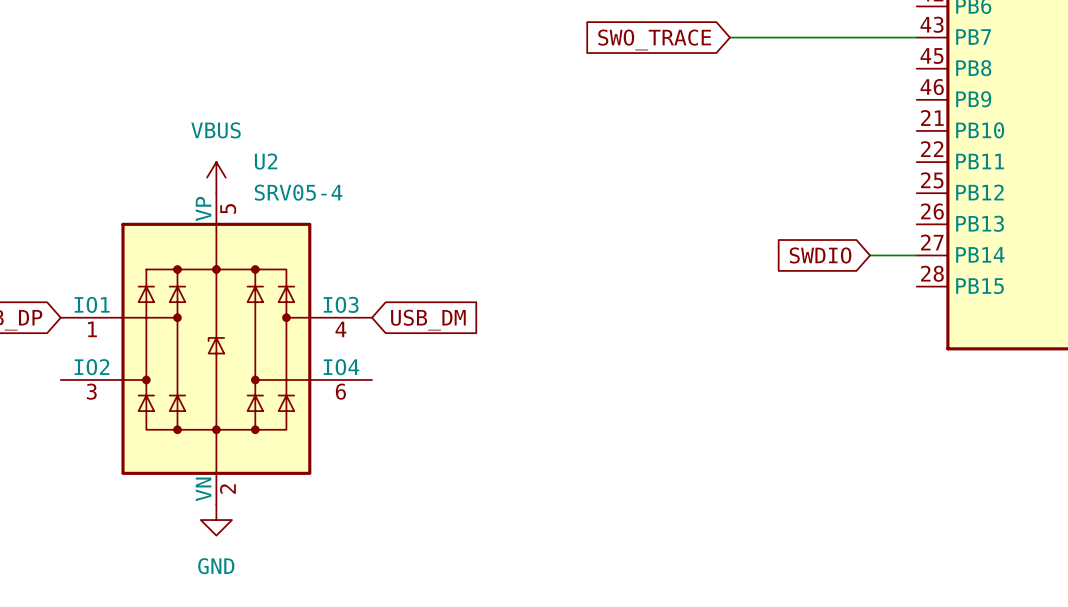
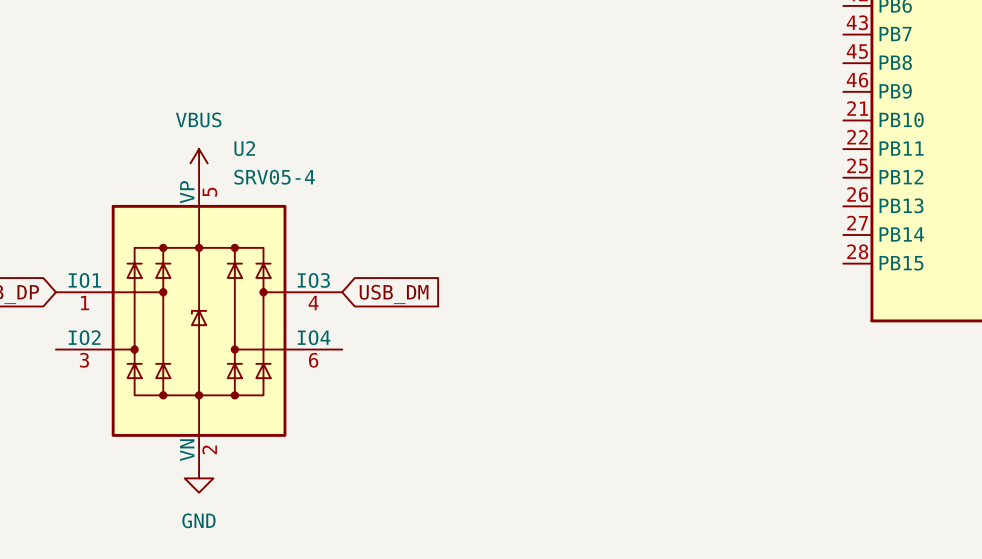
wire: (729, 37) (916, 37) -> none
global label: SWO_TRACE (654, 39) -> none
global label: SWDIO (820, 255) -> none
wire: (870, 255) (916, 255) -> none

